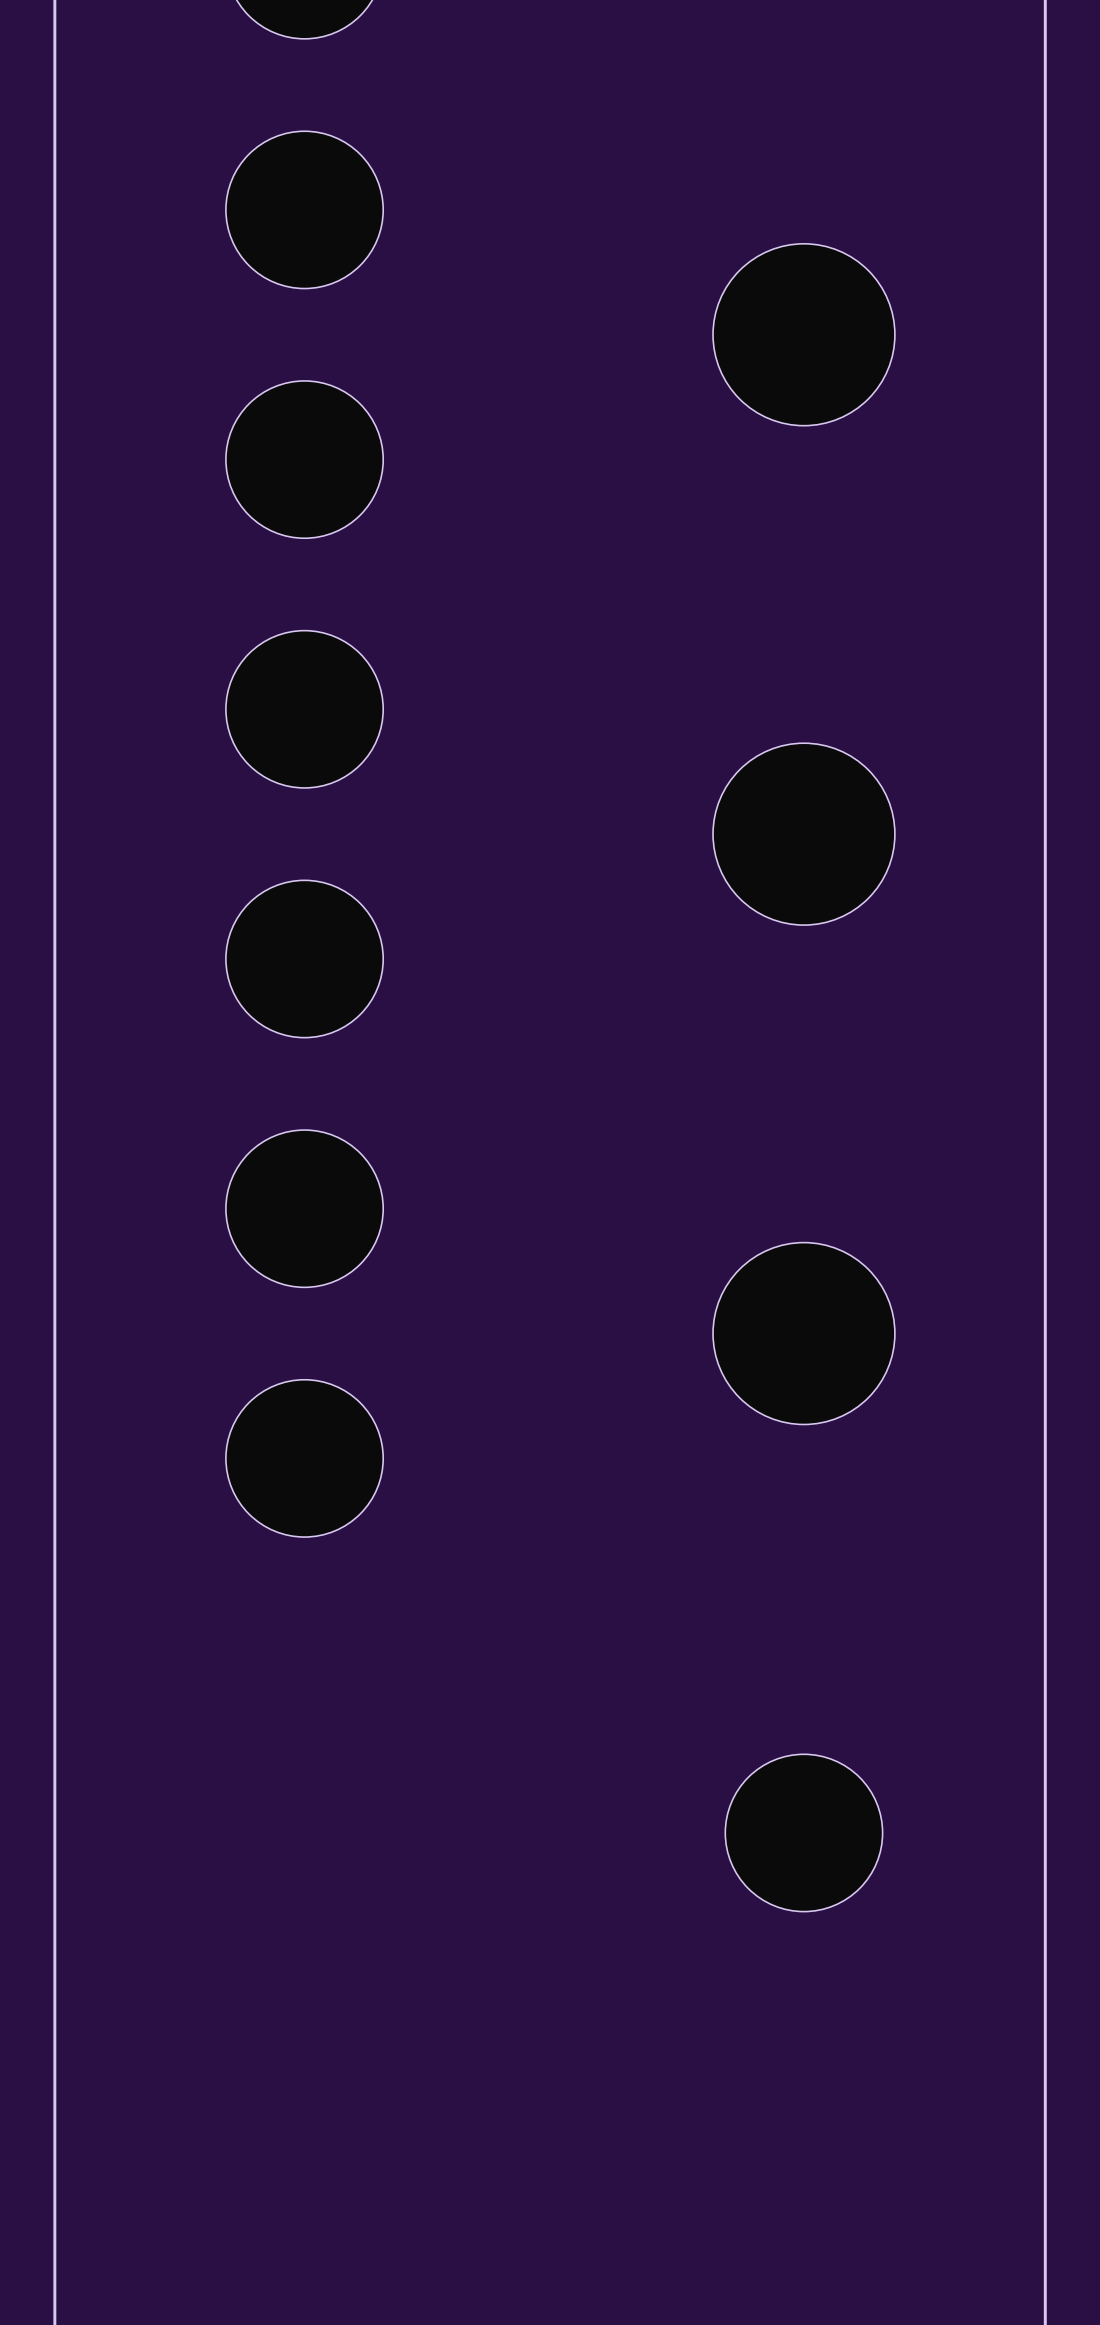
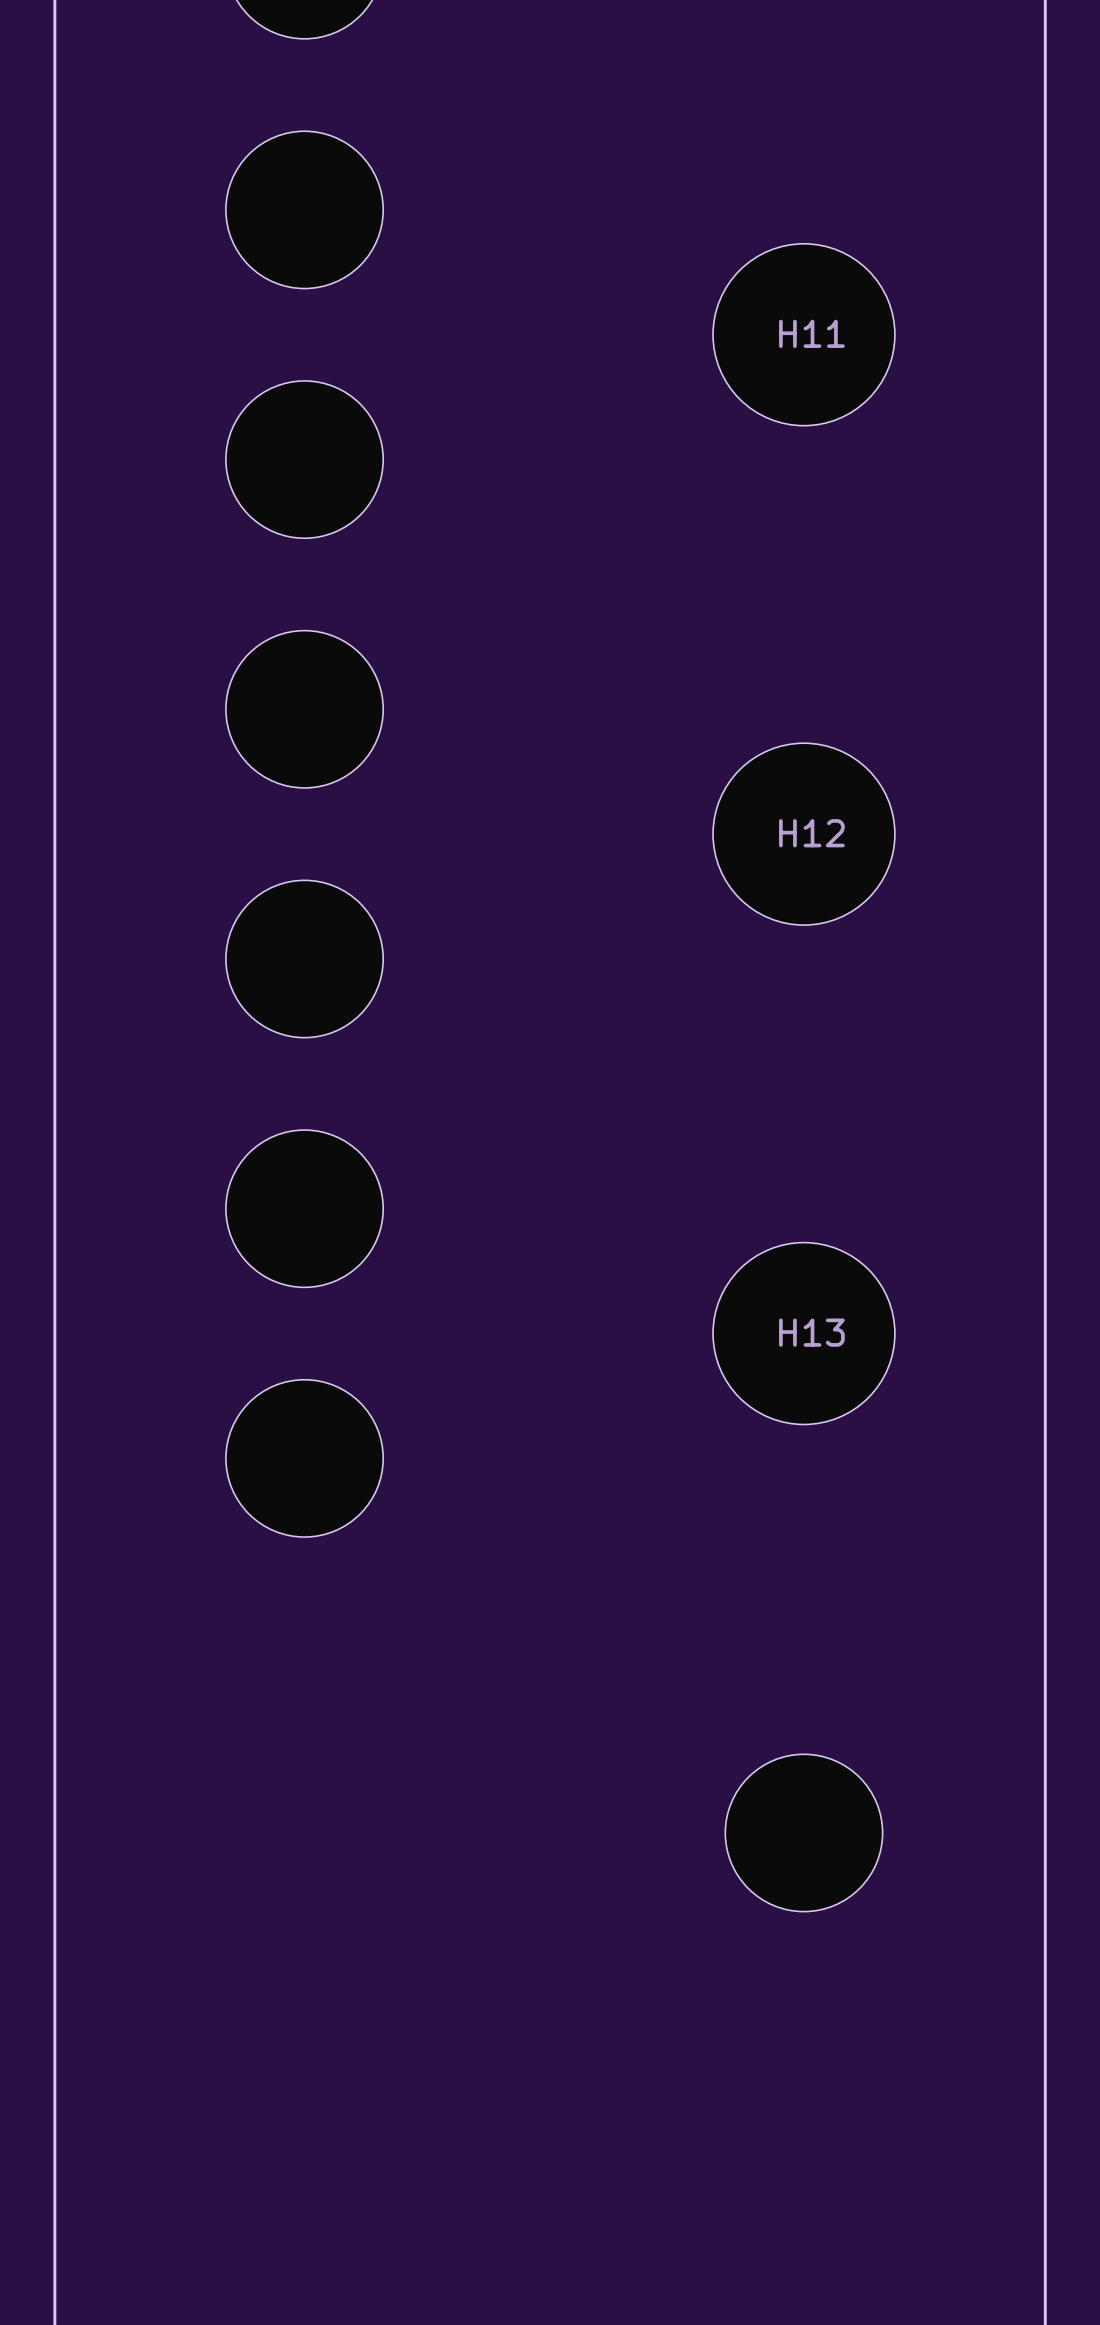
H11 name: none -> H11 (811, 333)
H12 name: none -> H12 (811, 833)
H13 name: none -> H13 (811, 1332)

